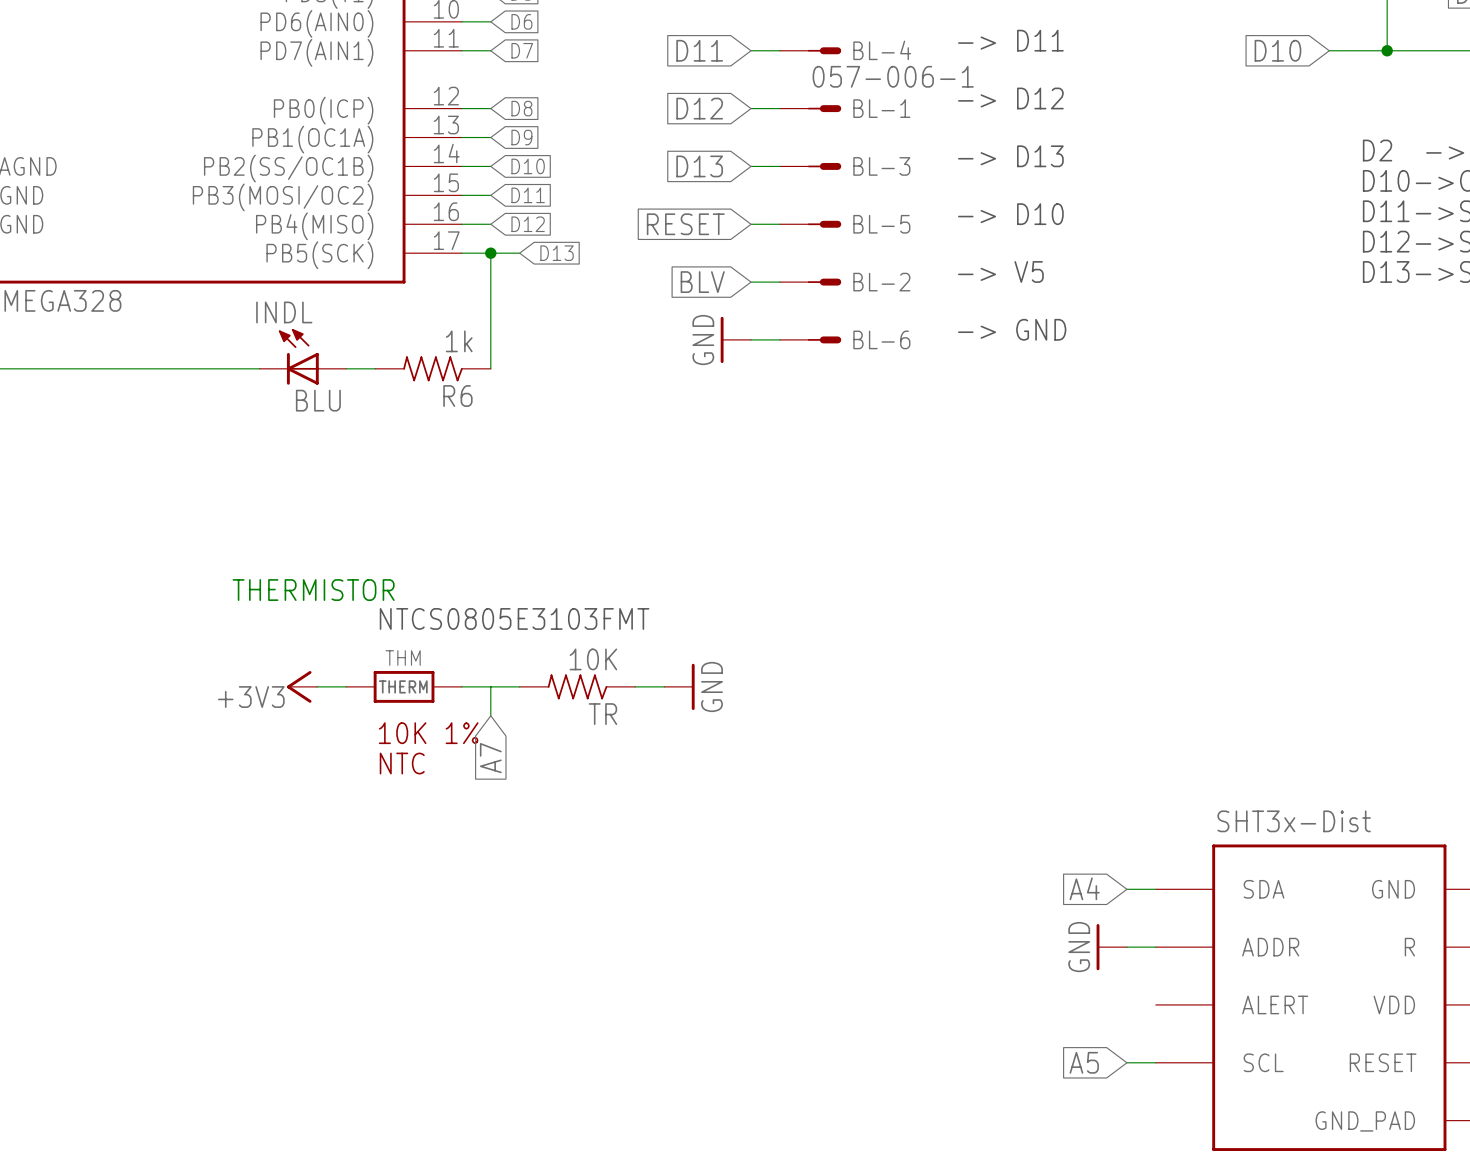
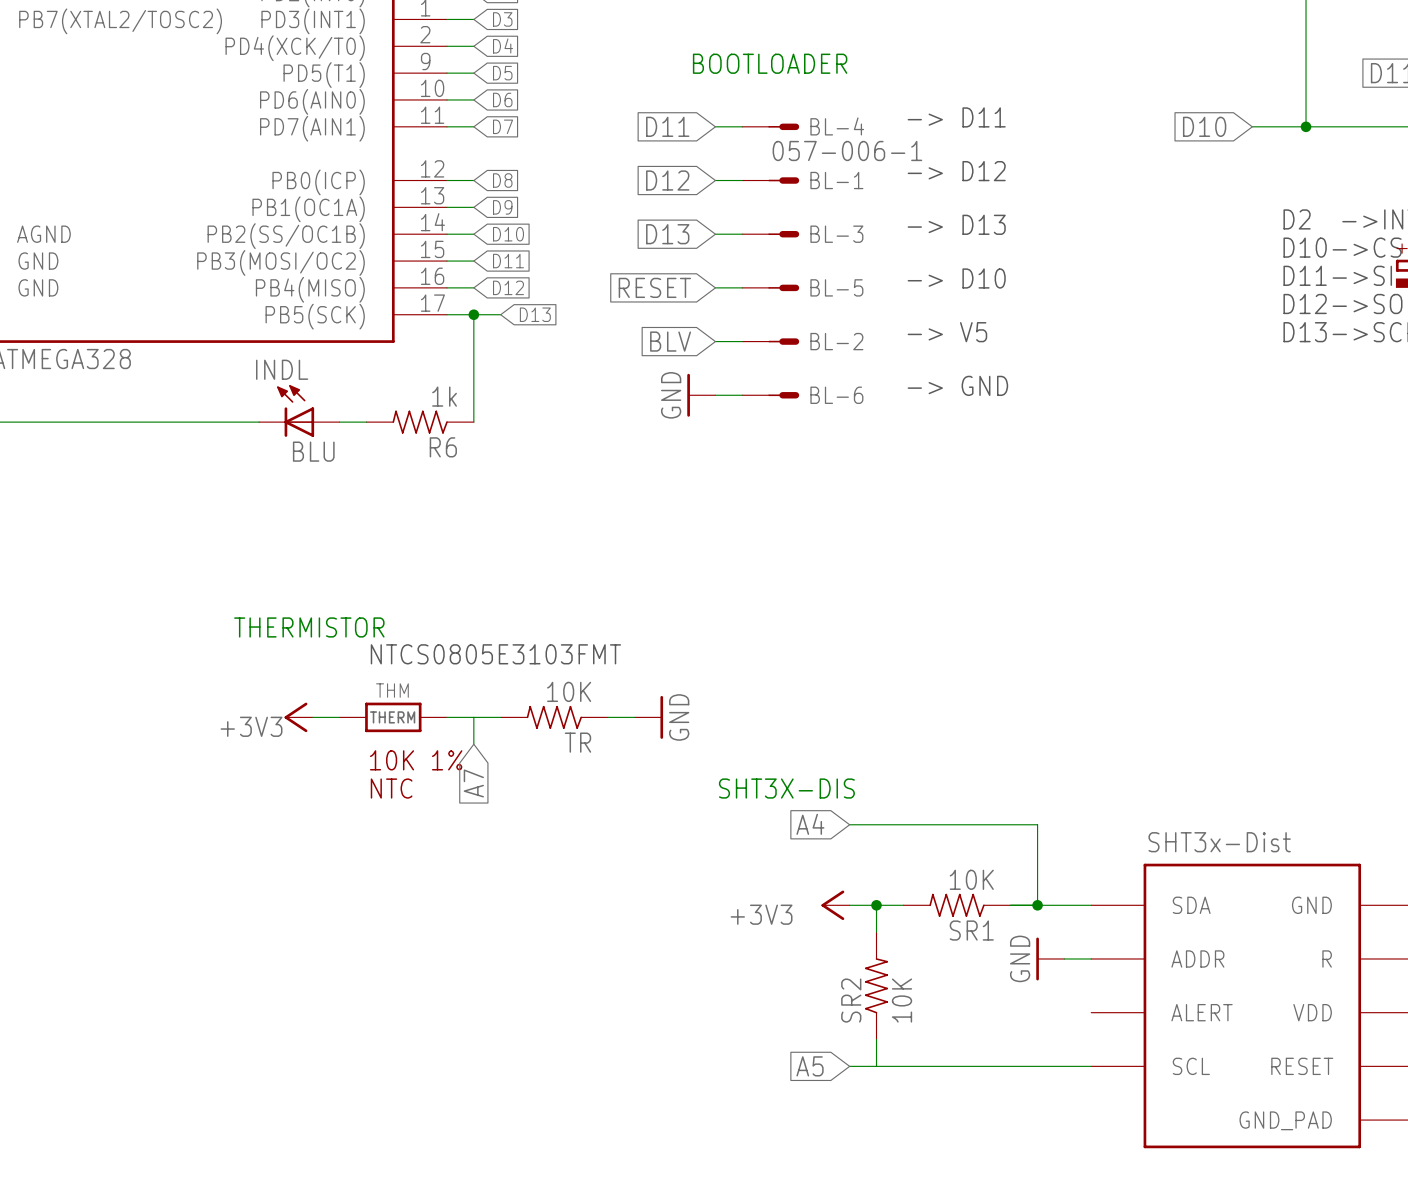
text: none -> SHT3X-DIS (786, 788)
wire: none -> (849, 824) (1037, 824) (1037, 905)
global label position: A4 (1084, 888) -> A4 (810, 824)
power symbol: none -> +3V3 (835, 905)
wire: none -> (849, 905) (903, 905)
wire: none -> (876, 905) (876, 932)
junction: none -> (876, 905)
SR1: none -> 10K (957, 905)
wire: none -> (1010, 905) (1064, 905)
junction: none -> (1037, 905)
SR2: none -> 10K (876, 985)
wire: none -> (876, 1039) (876, 1066)
wire: none -> (849, 1066) (1064, 1066)
global label position: A5 (1084, 1062) -> A5 (810, 1066)

